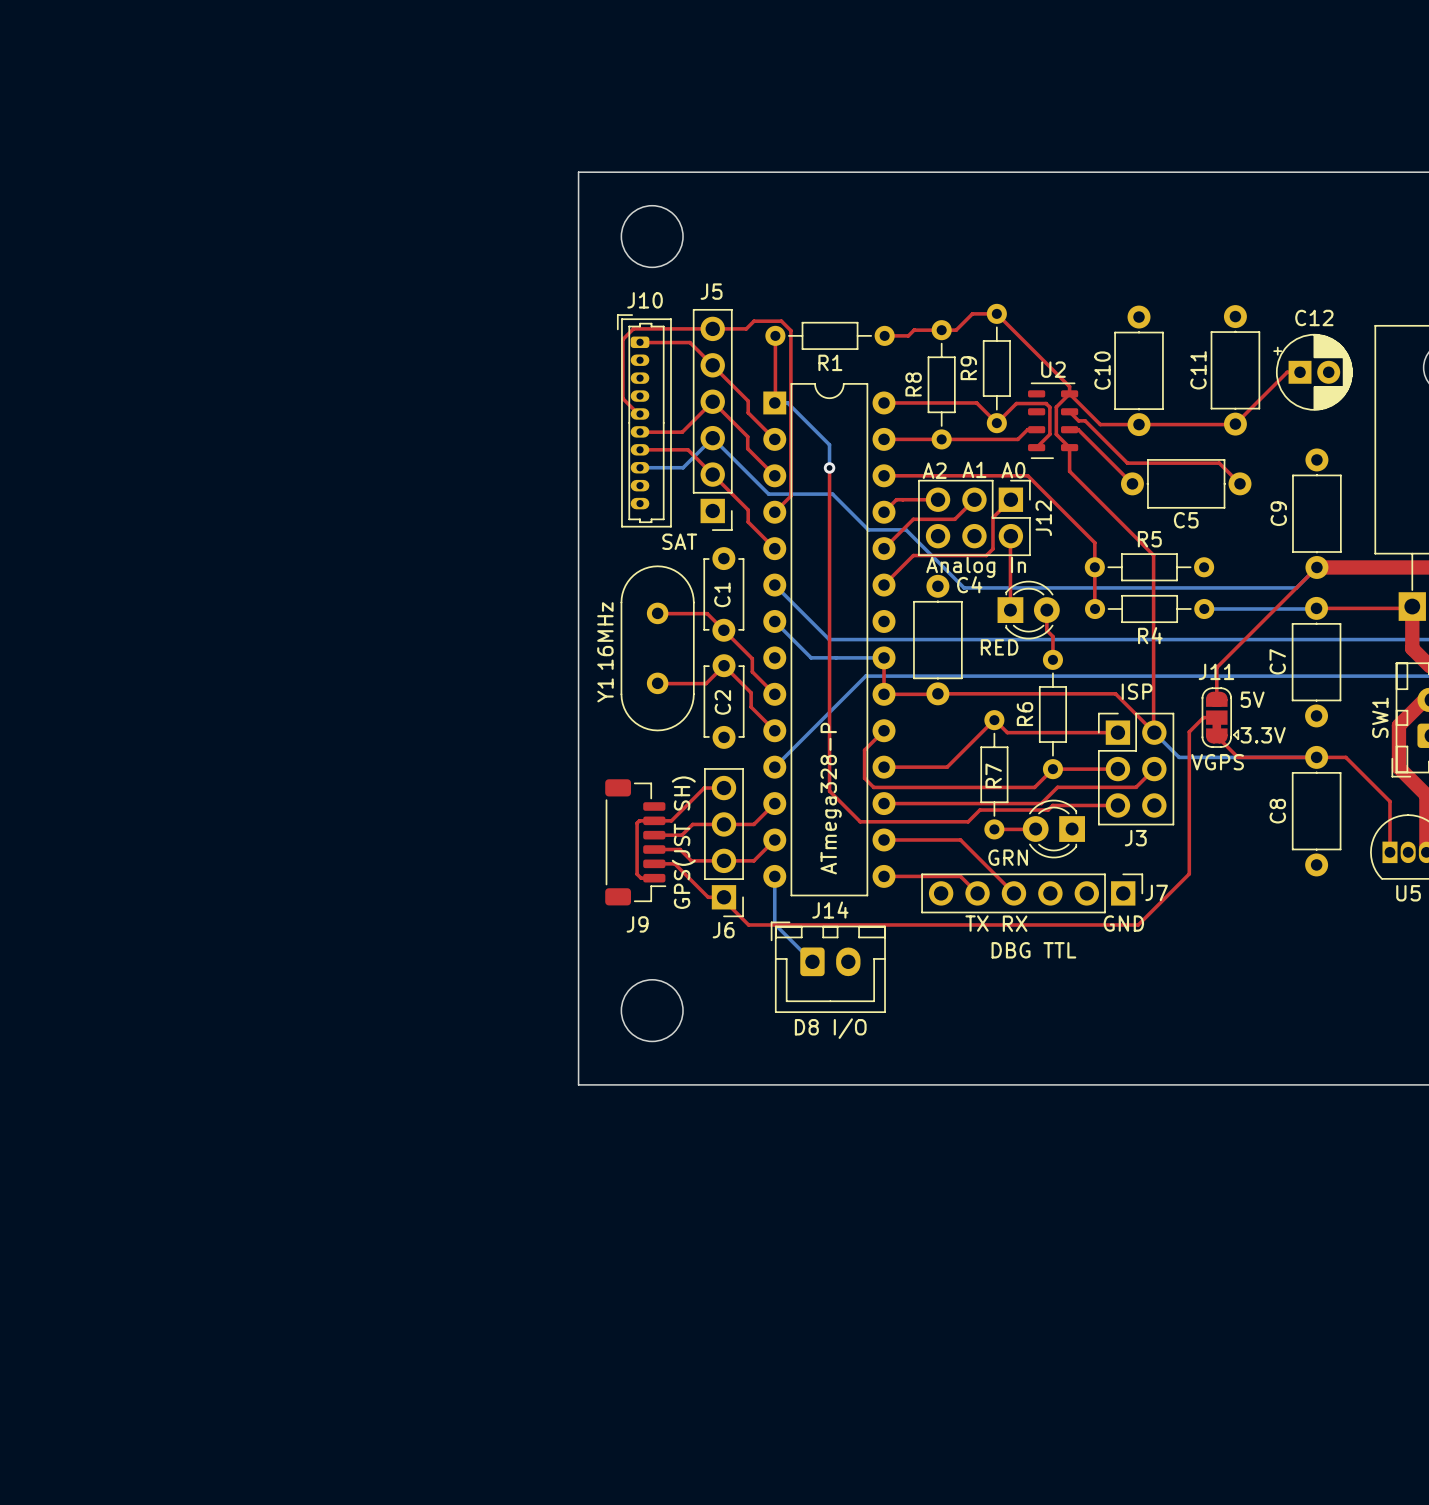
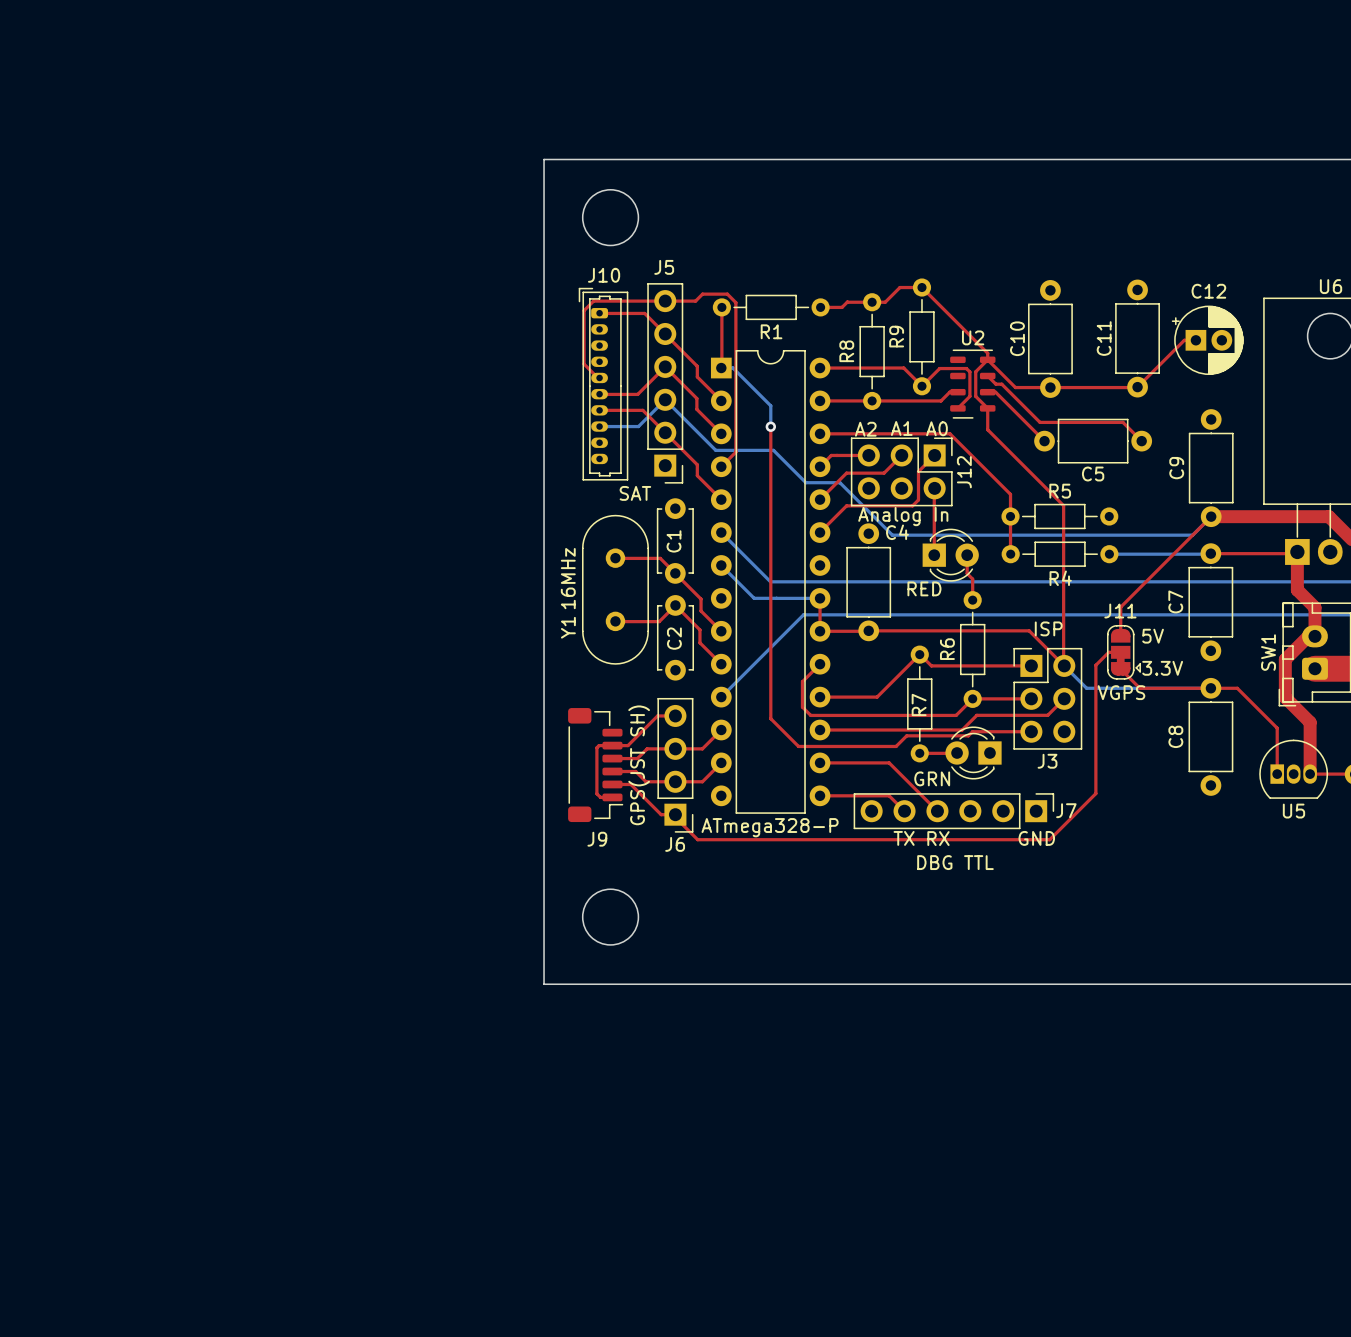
part value rotation: 0° (831, 798) -> 90° clockwise (770, 827)
bottom track: (774, 876) (774, 924) (812, 961) -> none
J14: D8 I/O (828, 967) -> none

